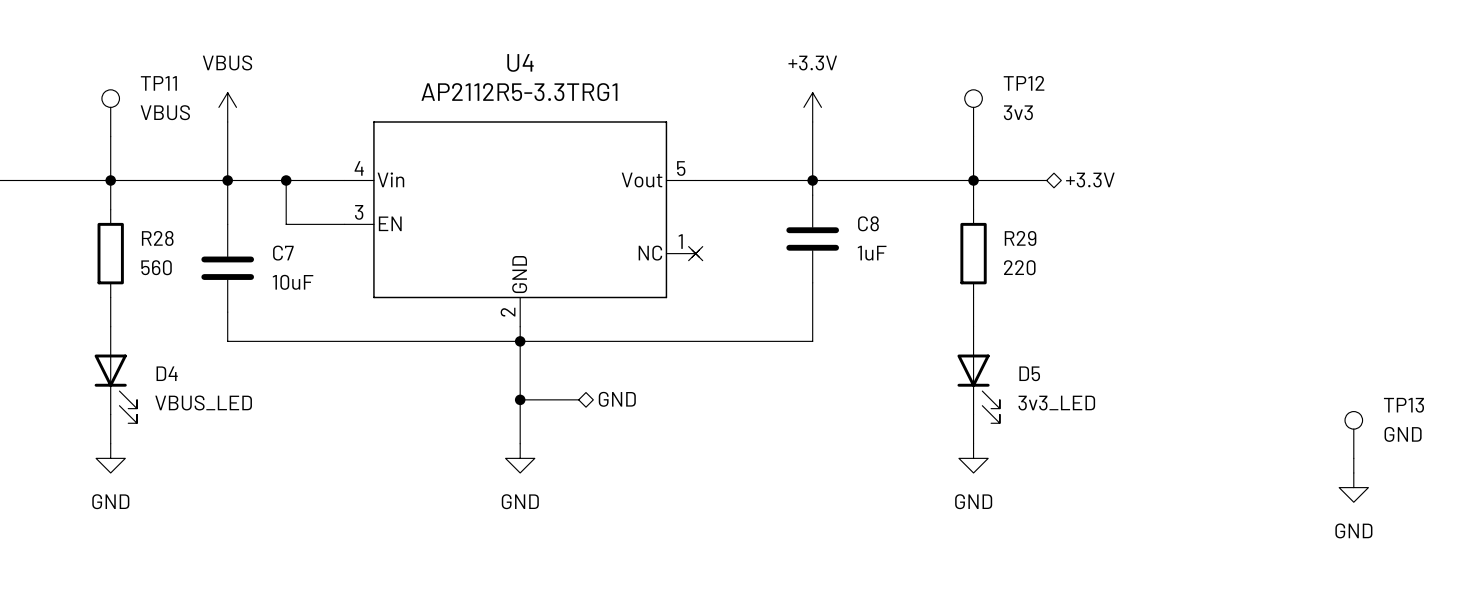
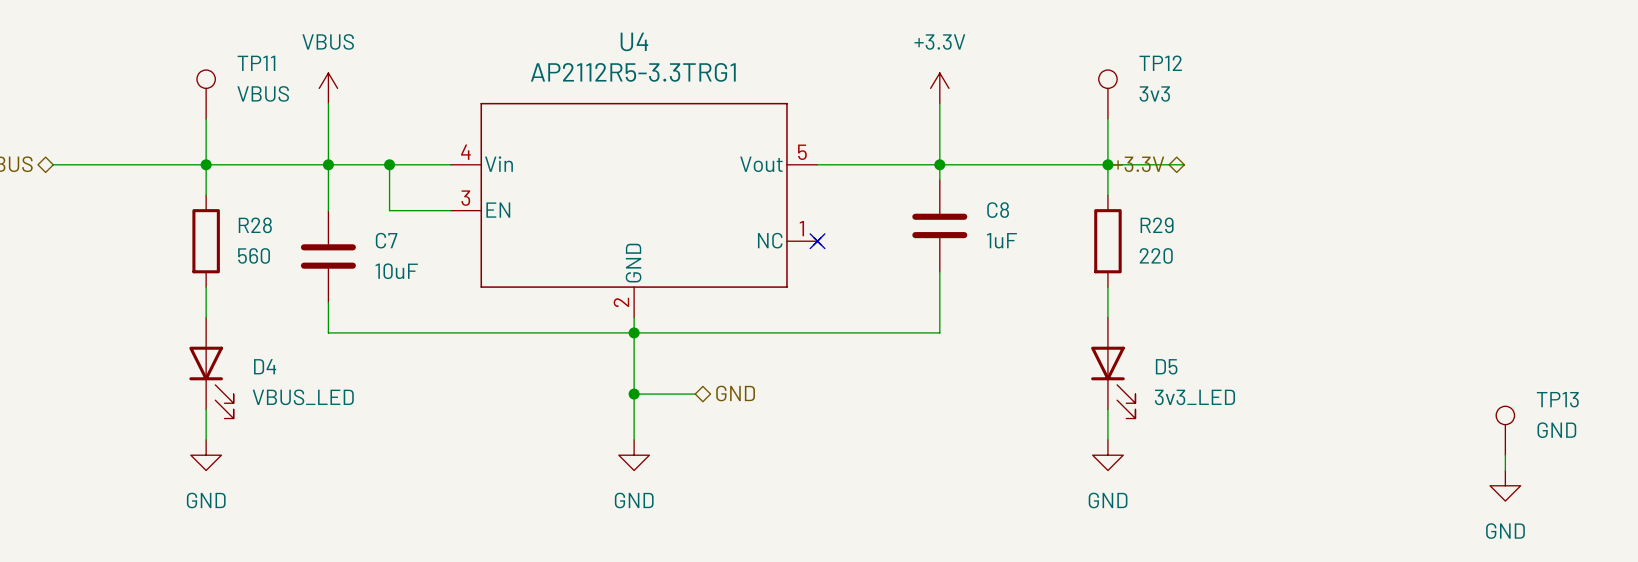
hierarchical label rotation: 0° (1090, 180) -> 180° (1138, 164)
hierarchical label position: +3.3V (1090, 180) -> +3.3V (1138, 164)

